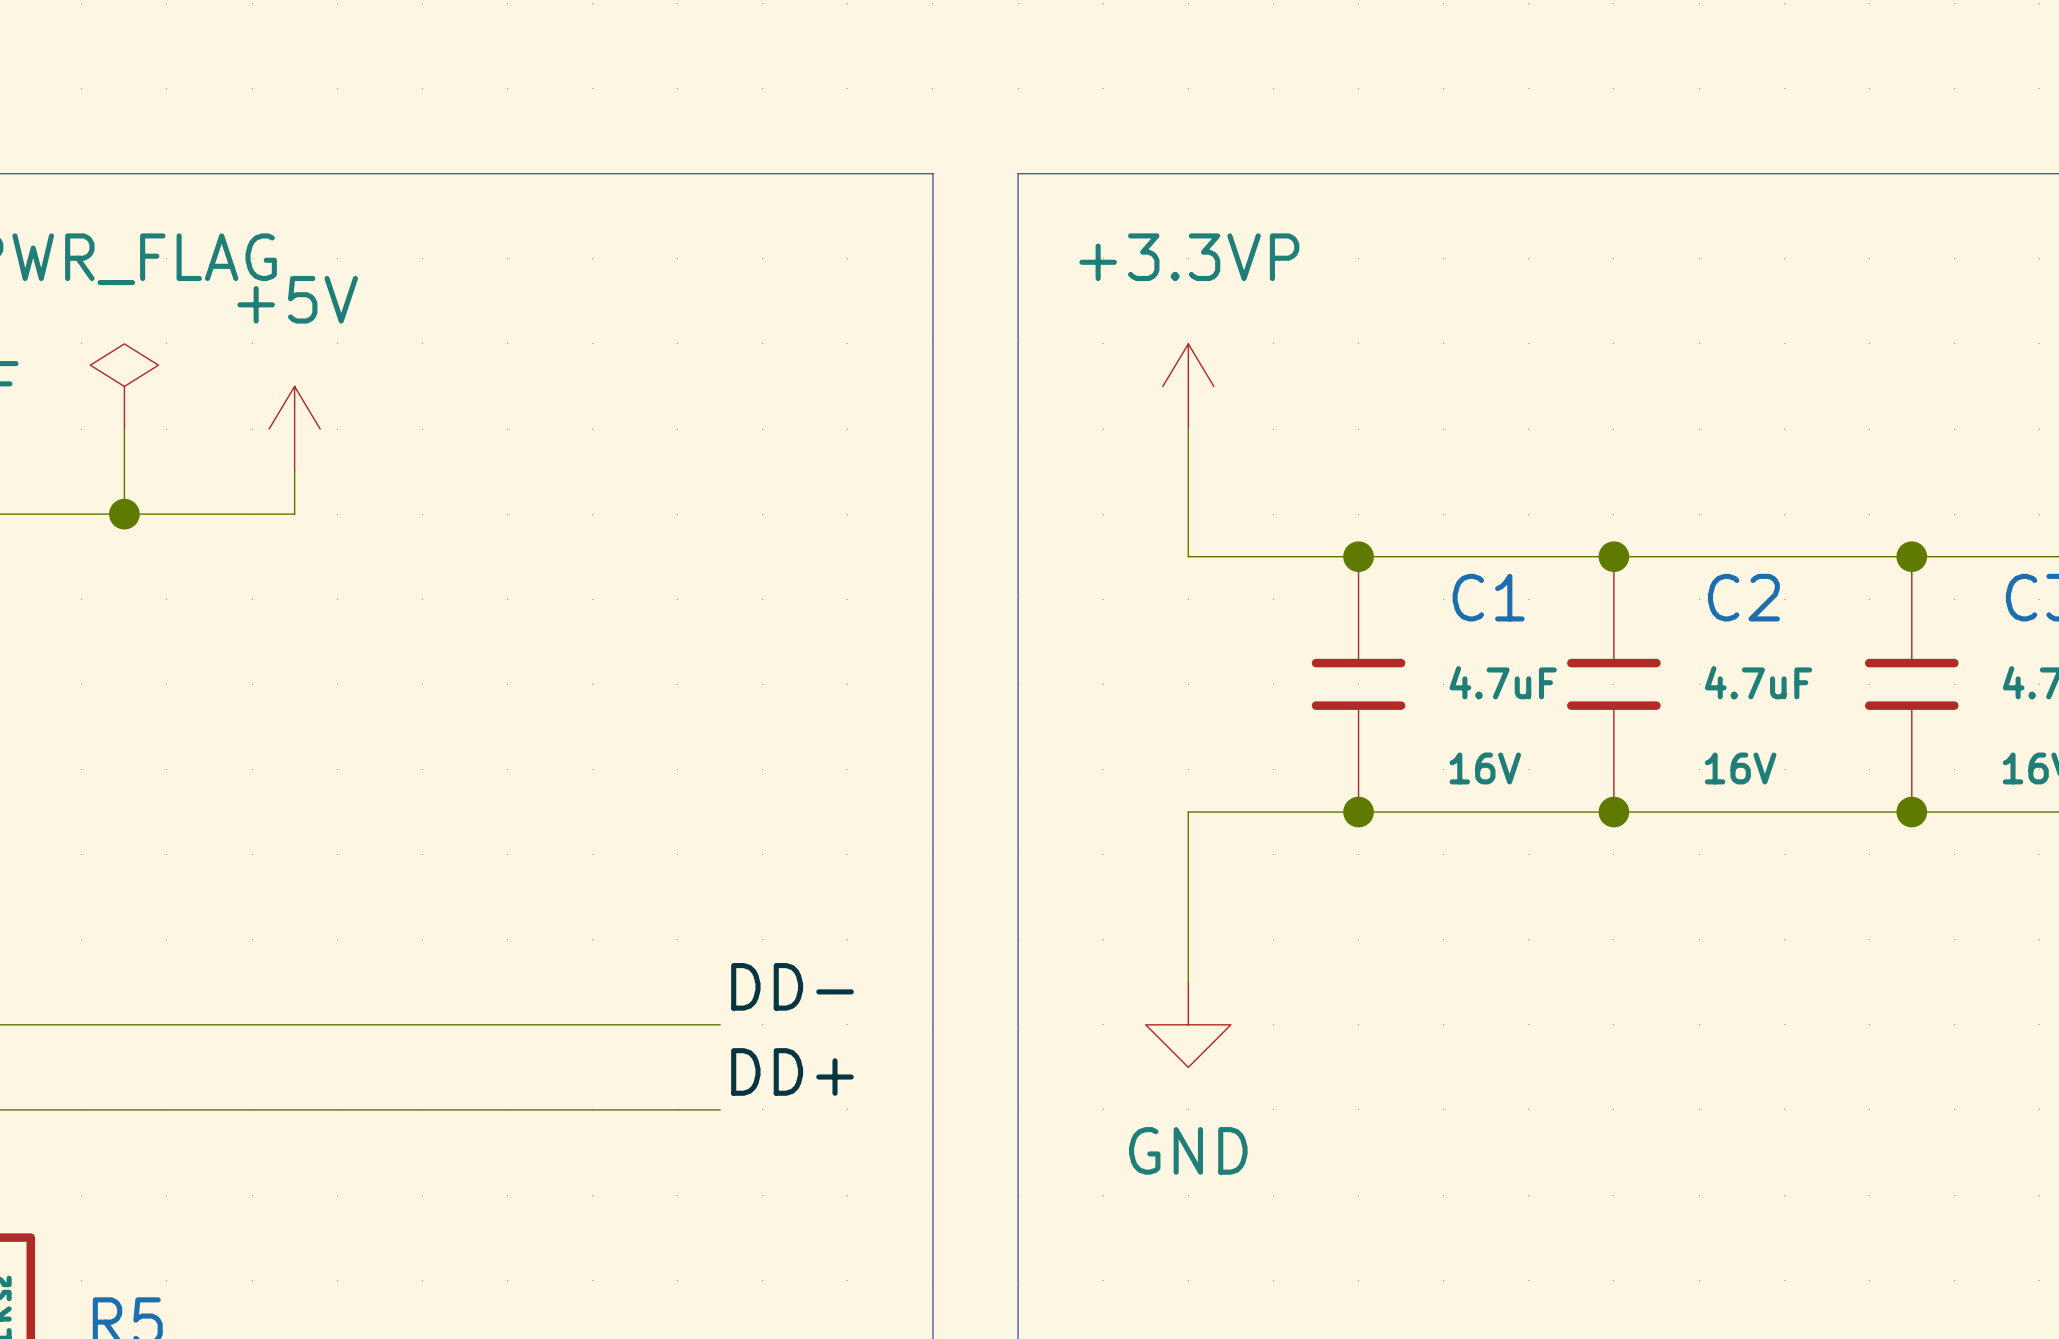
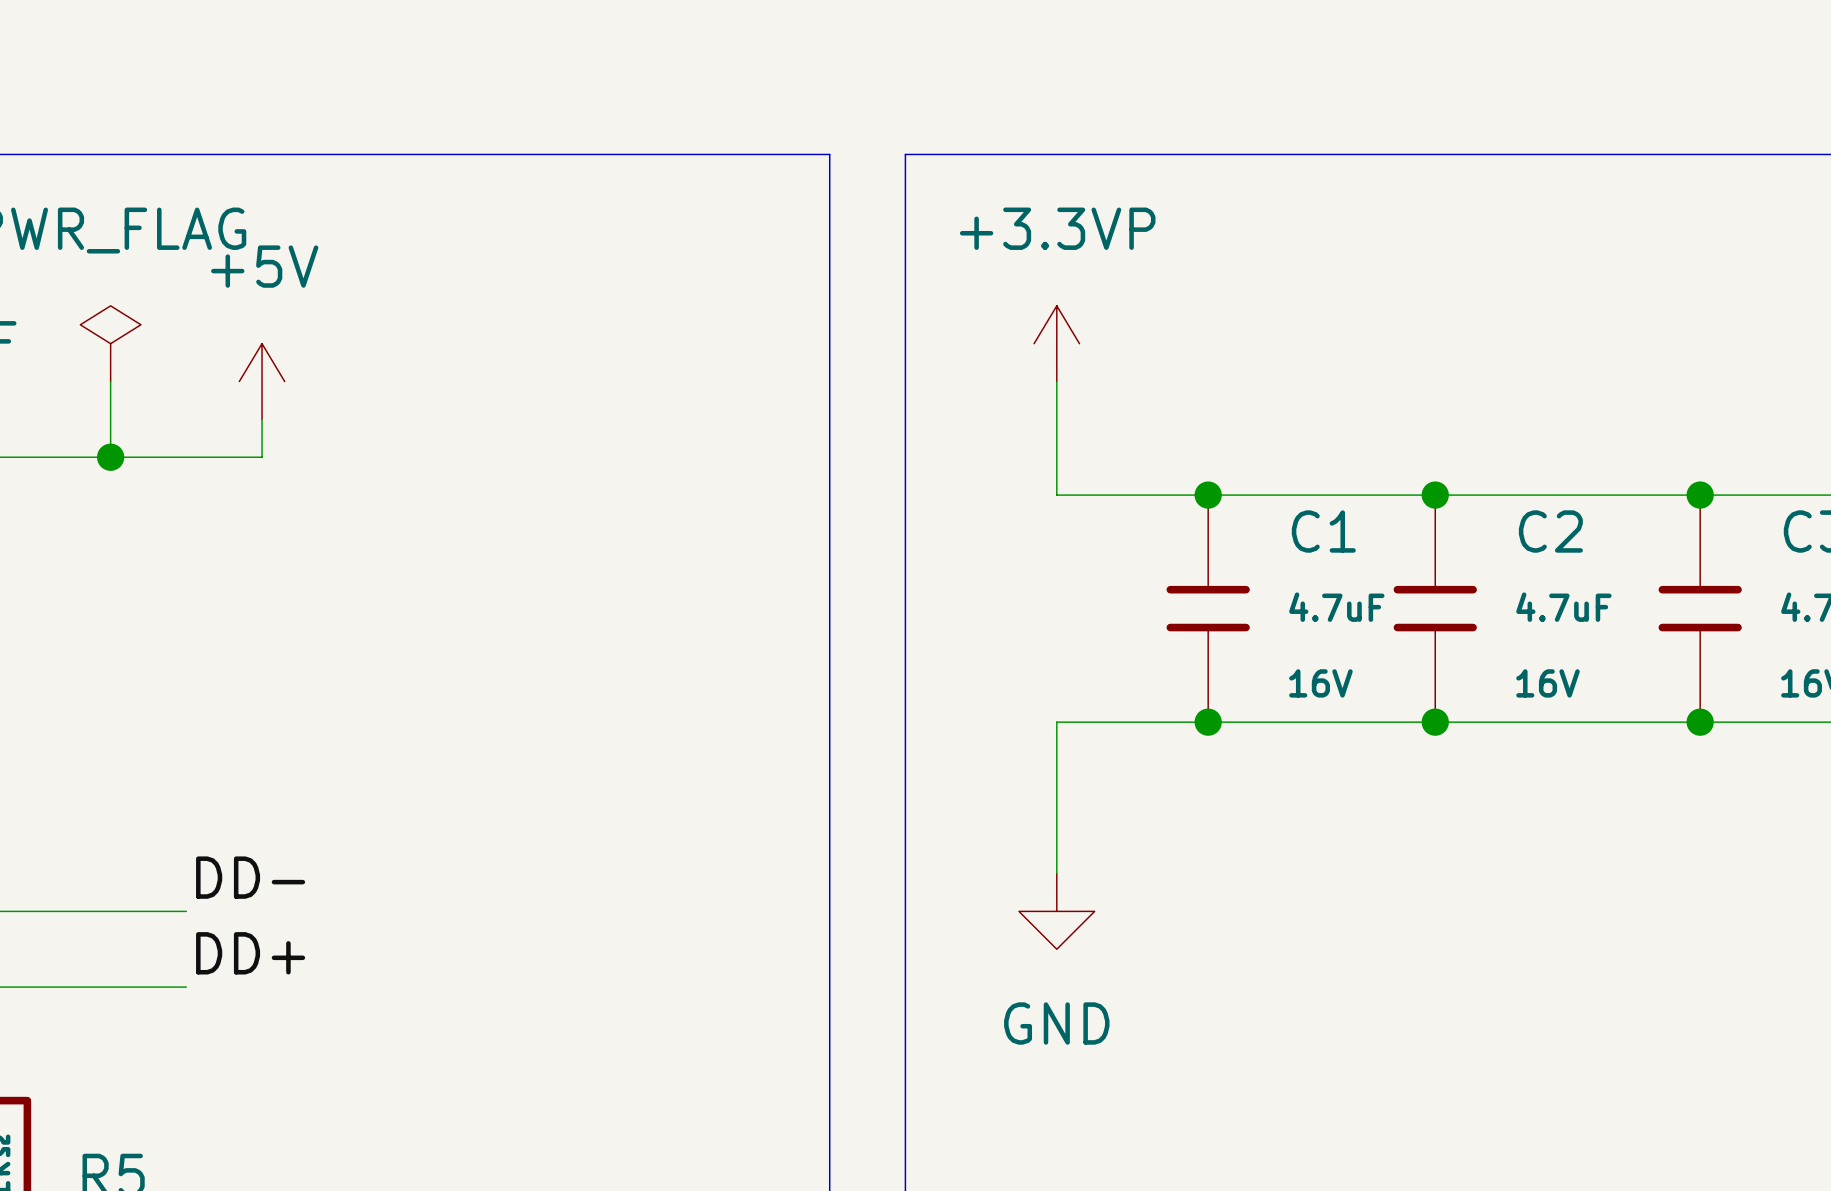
label position: DD- (792, 986) -> DD- (250, 877)
wire: (209, 1024) (720, 1024) -> none
label position: DD+ (792, 1071) -> DD+ (250, 953)
wire: (209, 1109) (720, 1109) -> none

